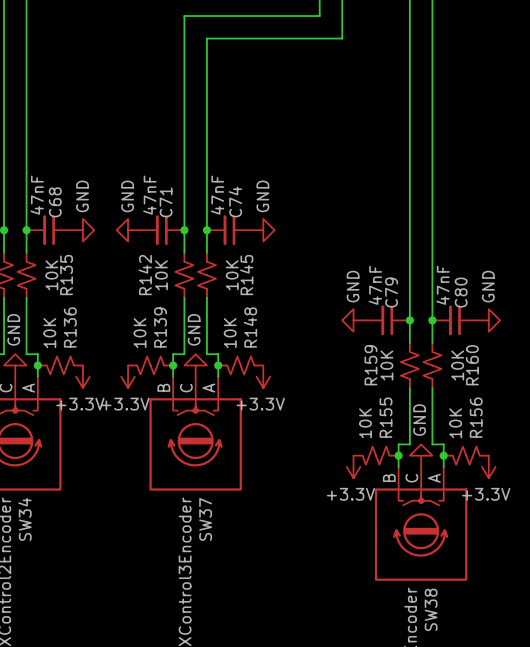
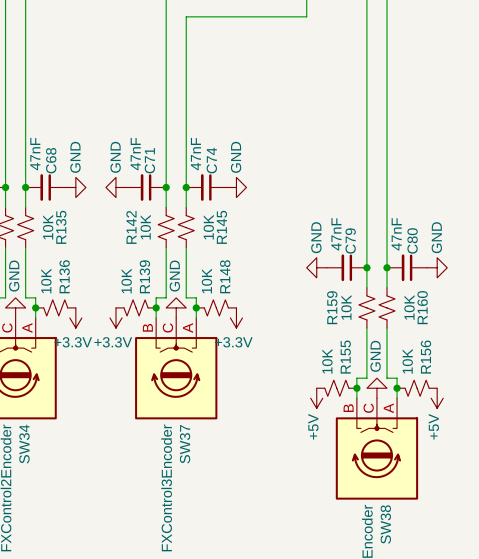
power symbol: +3.3V (353, 466) -> +5V (316, 398)
power symbol: +3.3V (488, 466) -> +5V (437, 398)

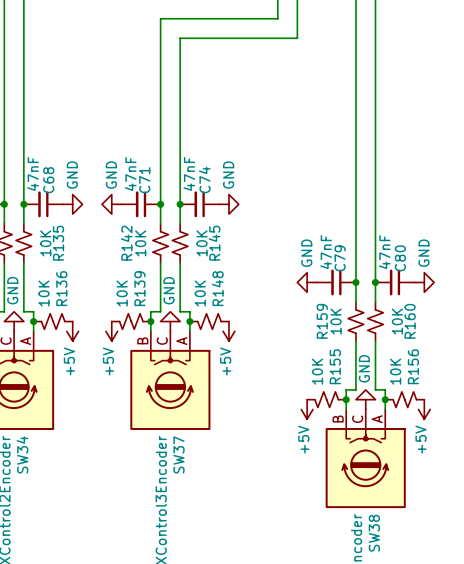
power symbol: +3.3V (75, 317) -> +5V (72, 331)
power symbol: +3.3V (115, 317) -> +5V (111, 331)
power symbol: +3.3V (236, 317) -> +5V (228, 331)

